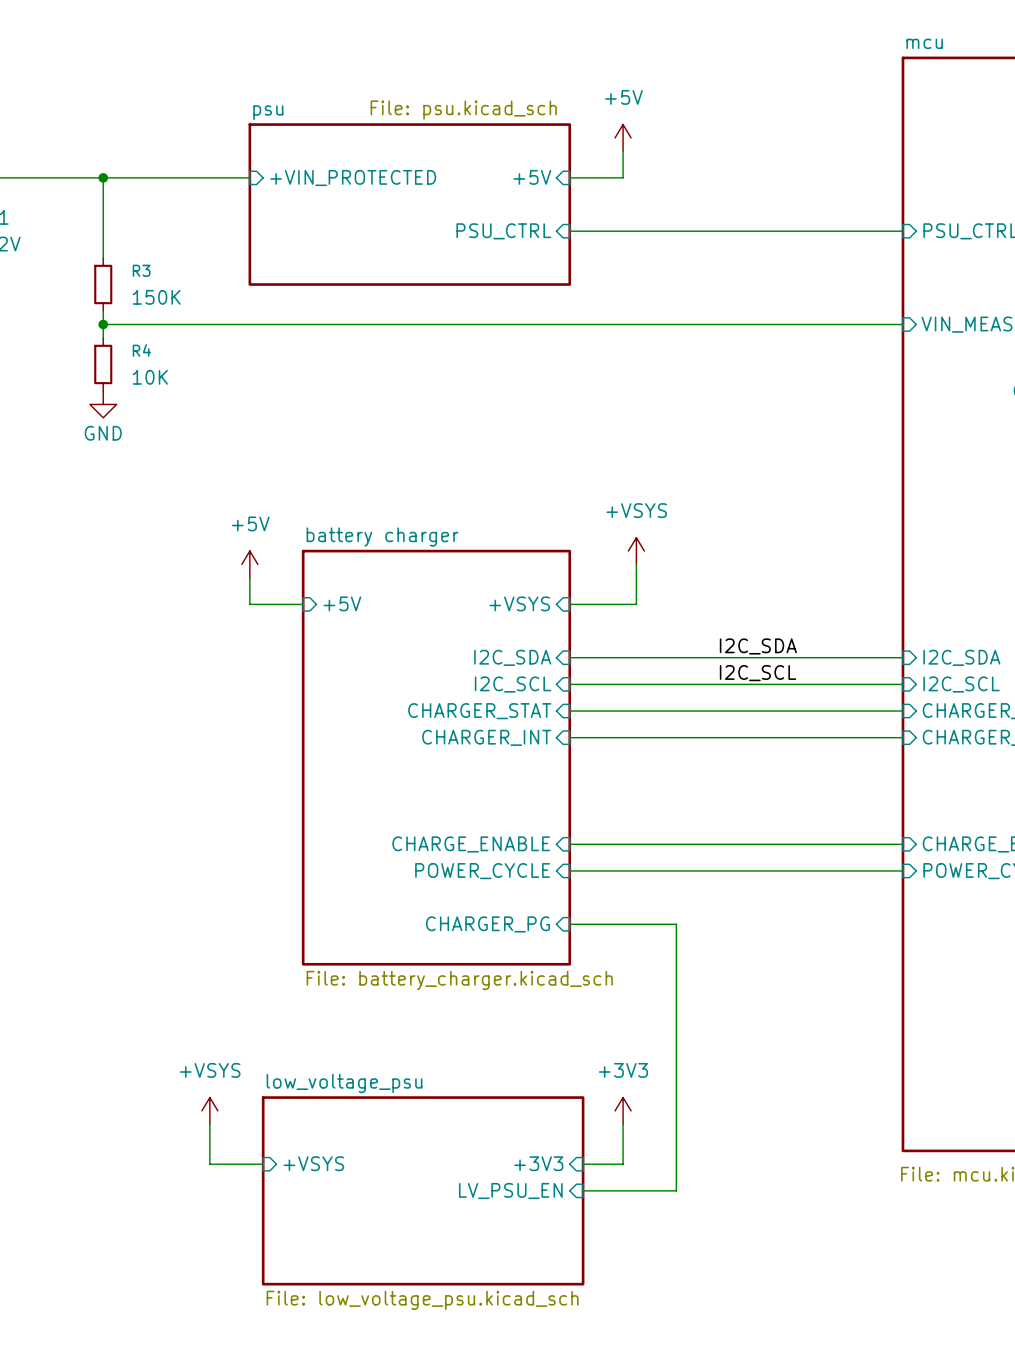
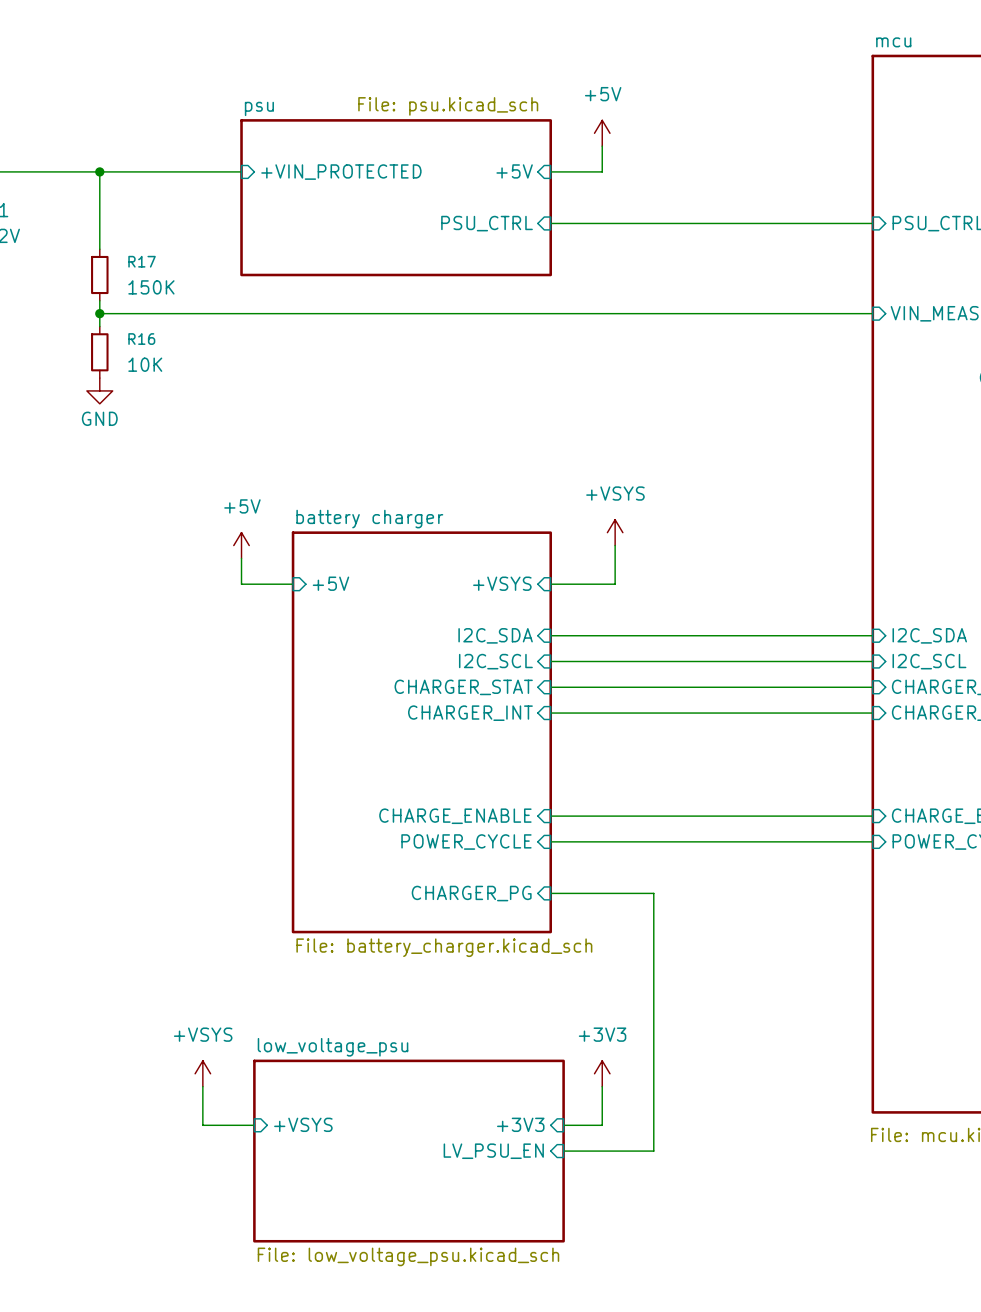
R3 name: R3 (141, 270) -> R17 (142, 261)
R4 name: R4 (141, 350) -> R16 (141, 339)
label: I2C_SDA (758, 646) -> none
label: I2C_SCL (758, 673) -> none

